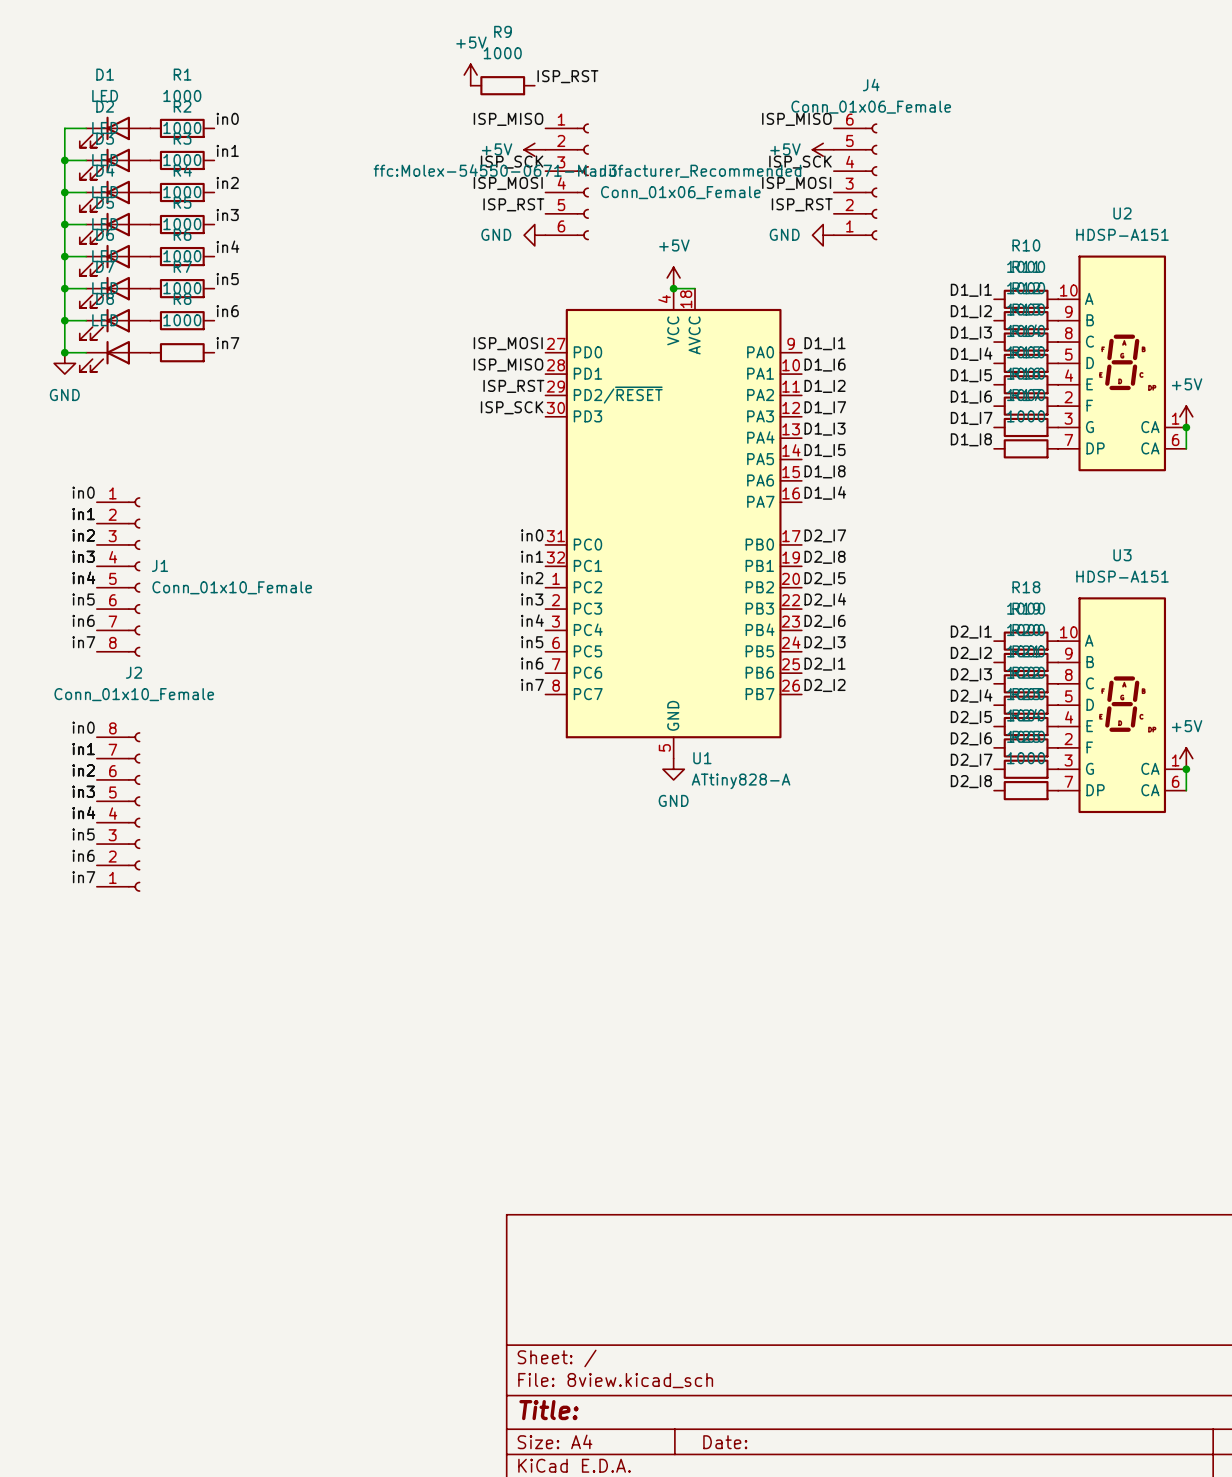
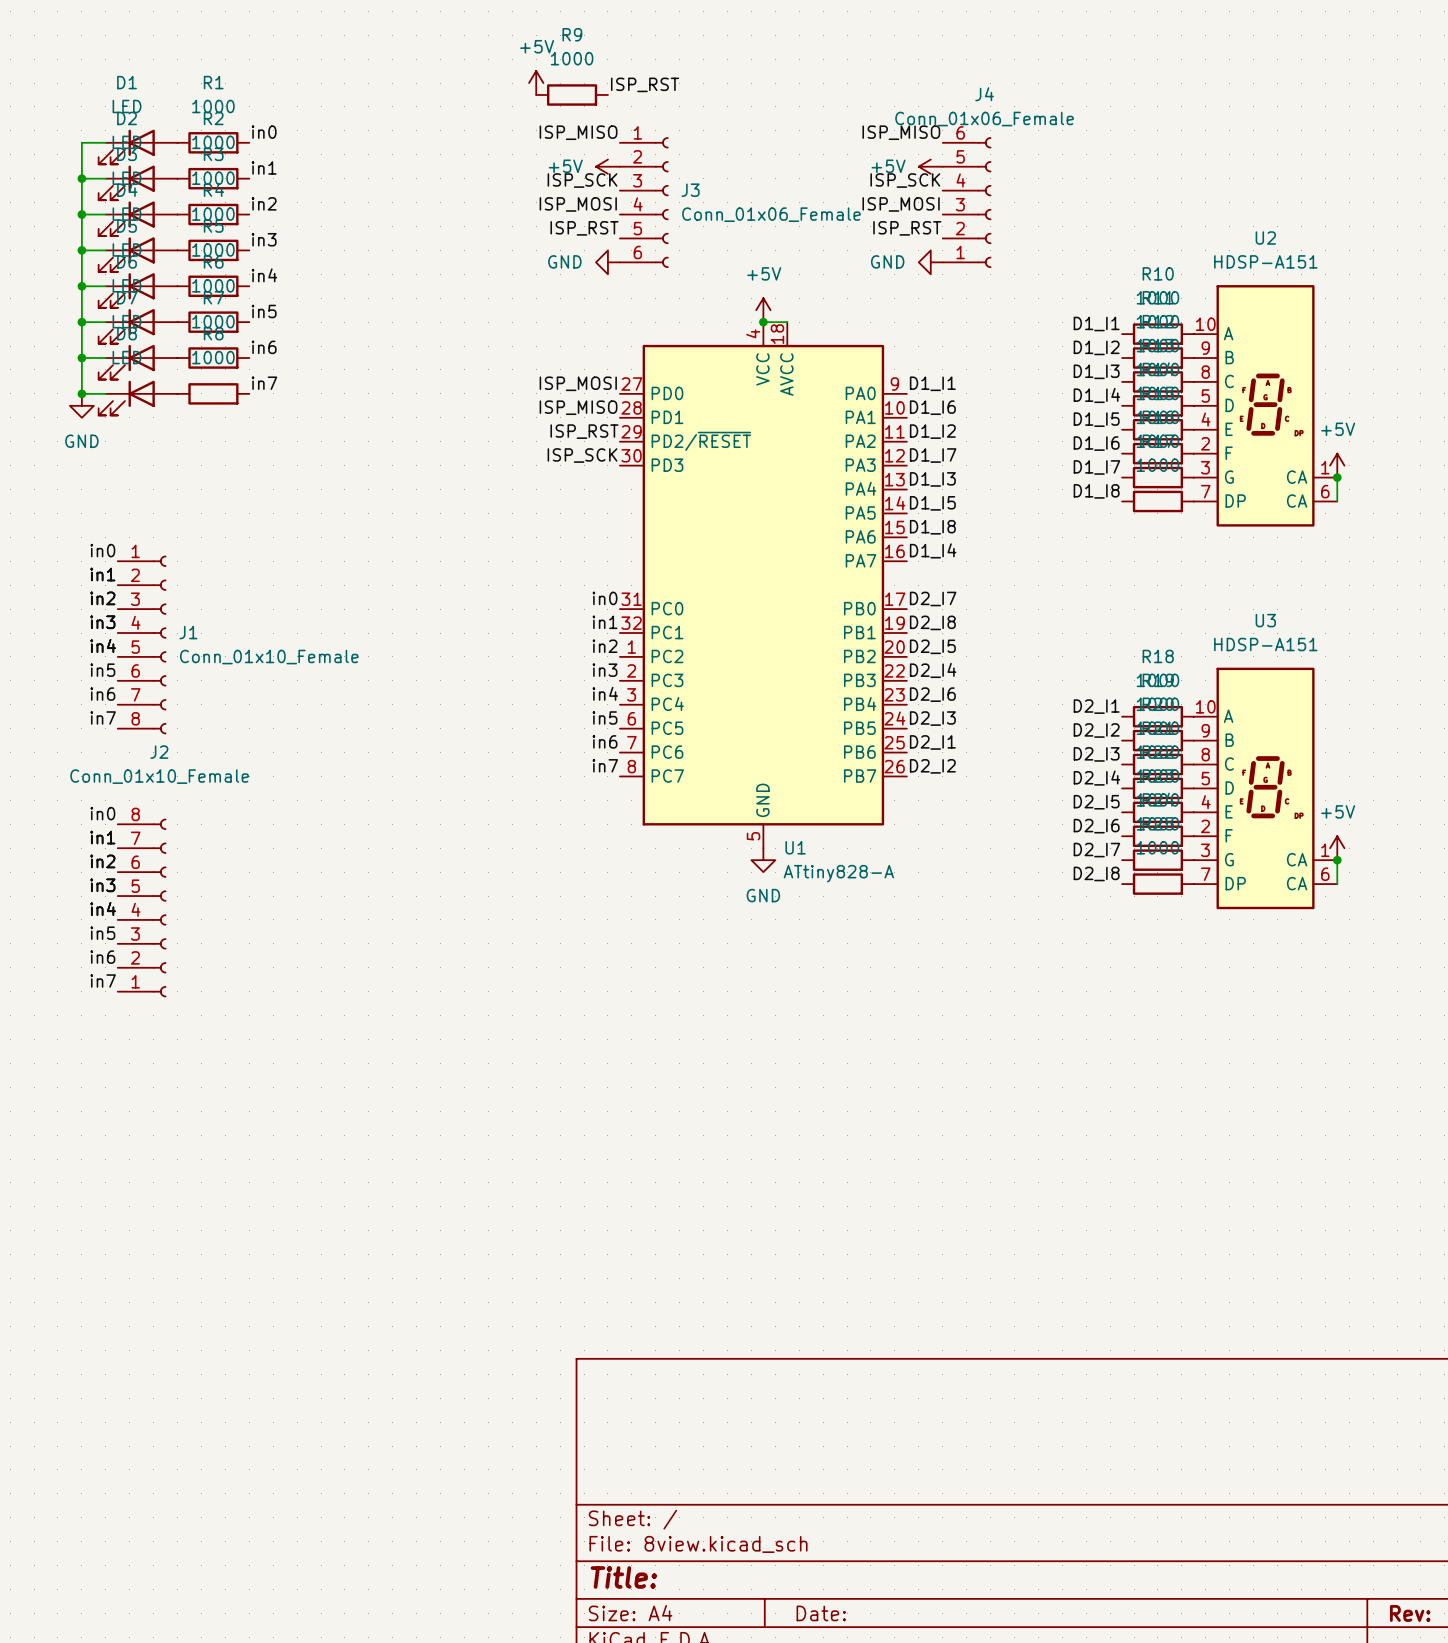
J3 text: ffc:Molex-54550-0671-Manufacturer_Recommended (587, 170) -> none

